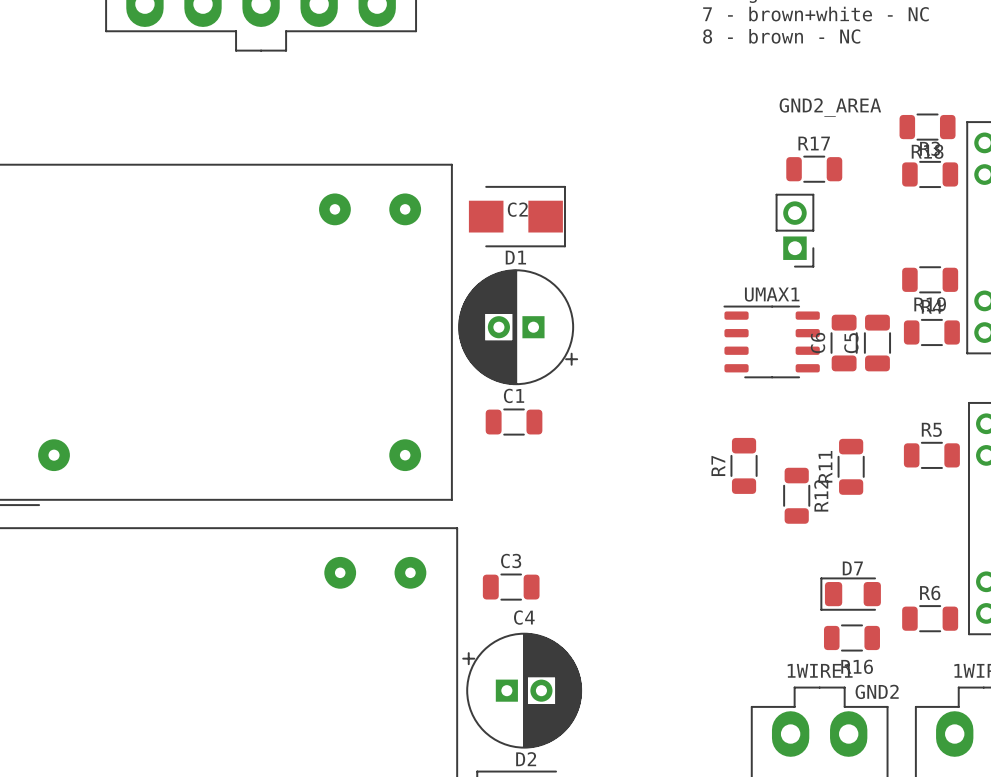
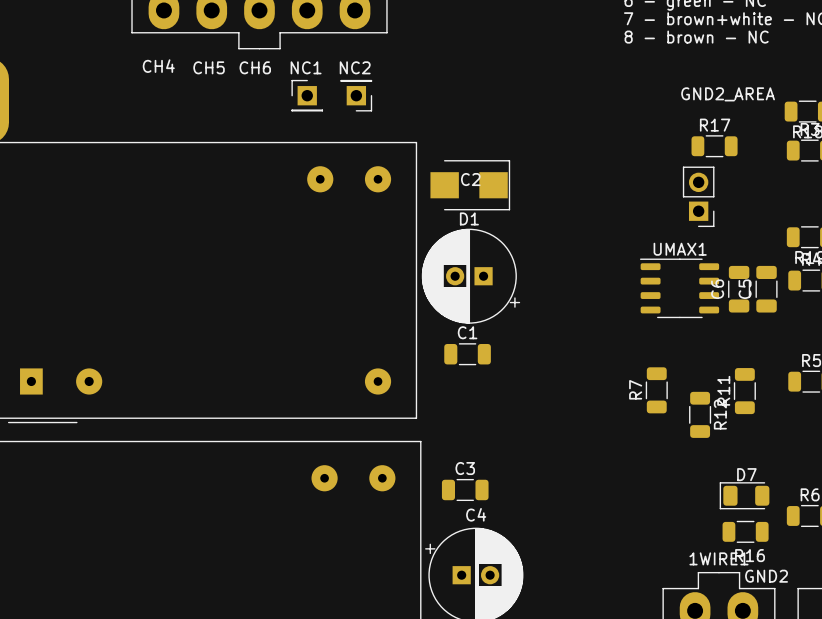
text: none -> CH4 (158, 66)
text: none -> CH5 (209, 67)
text: none -> CH6 (255, 67)
text: none -> NC1 (306, 67)
text: none -> NC2 (355, 67)
part: none -> (307, 95)
part: none -> (356, 95)

